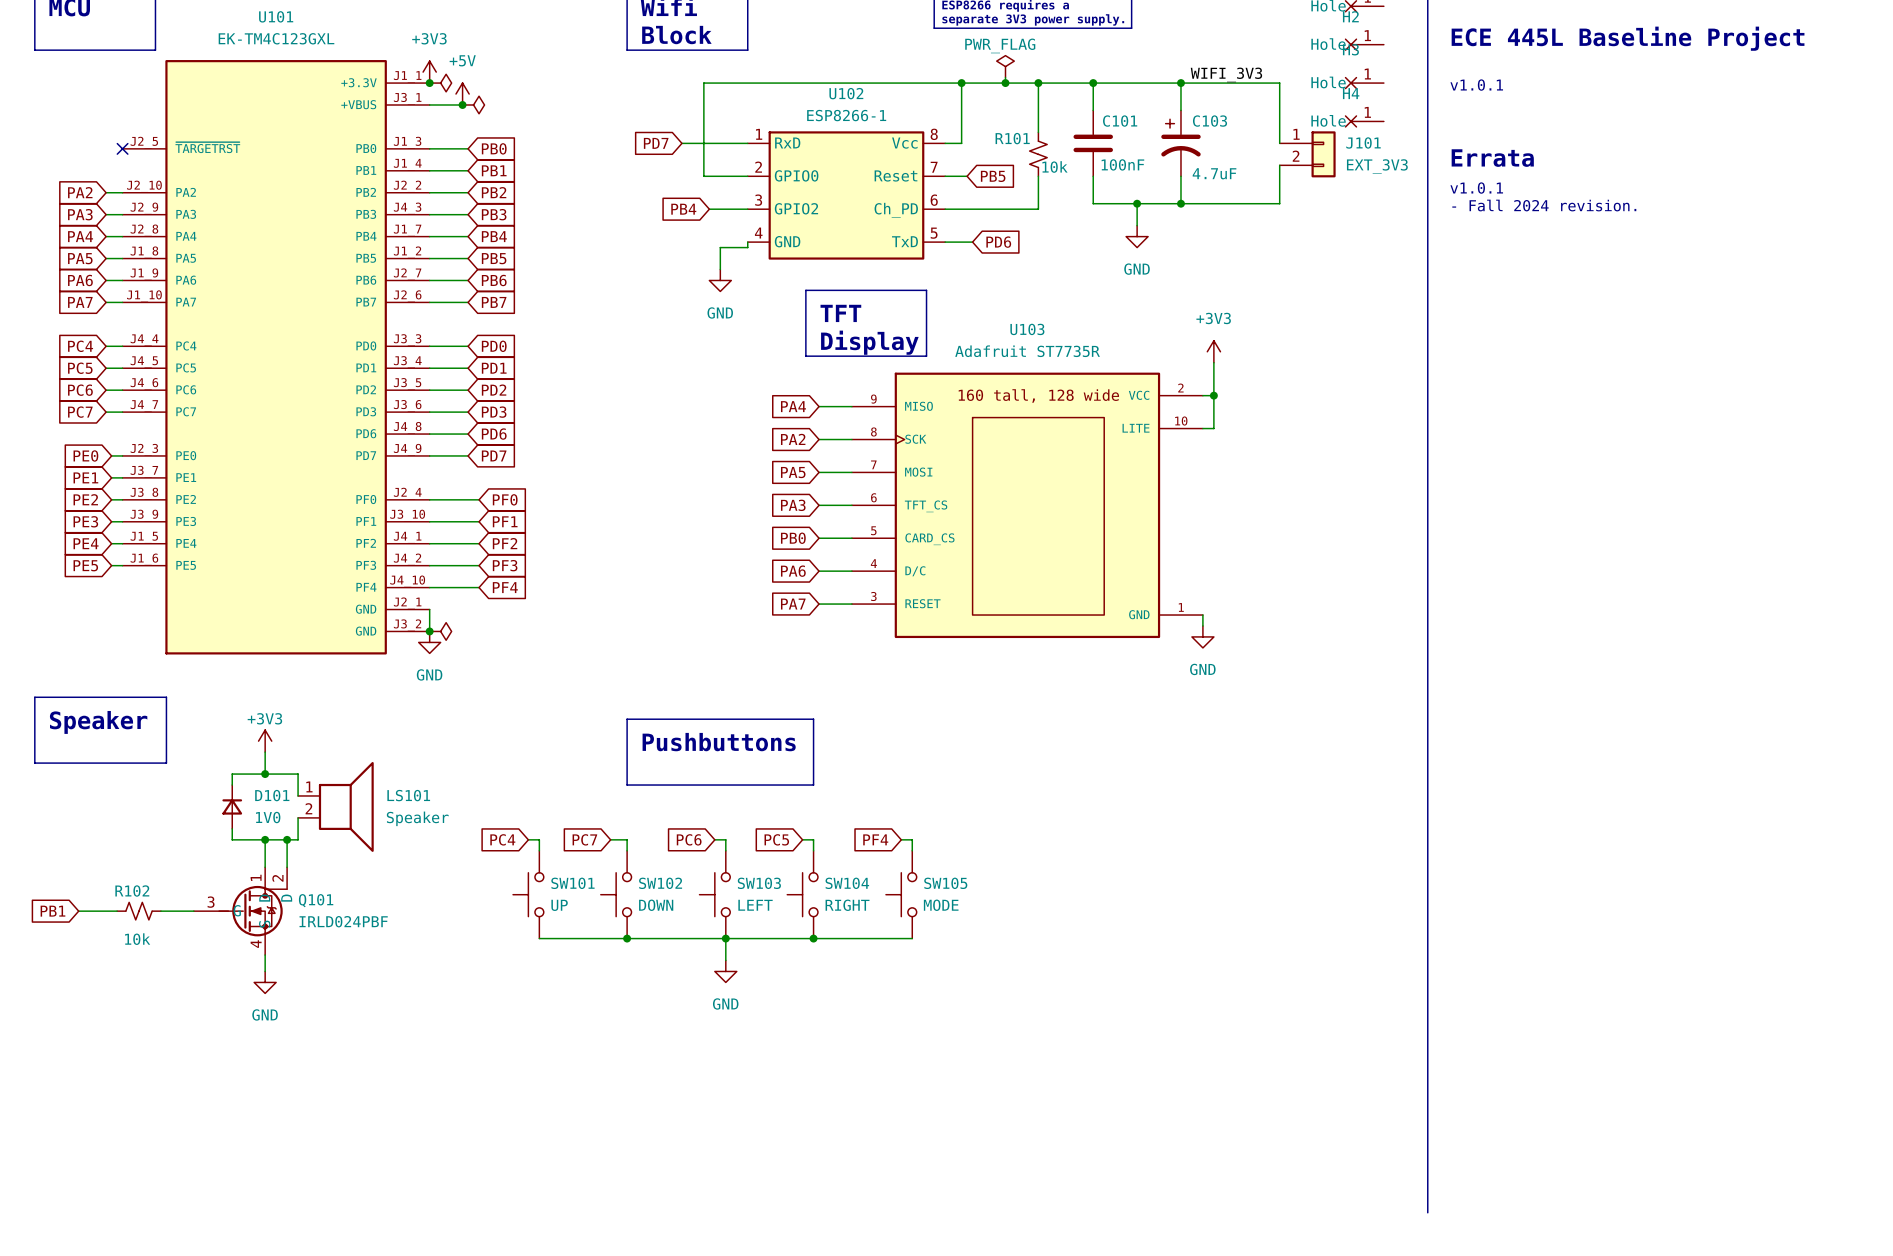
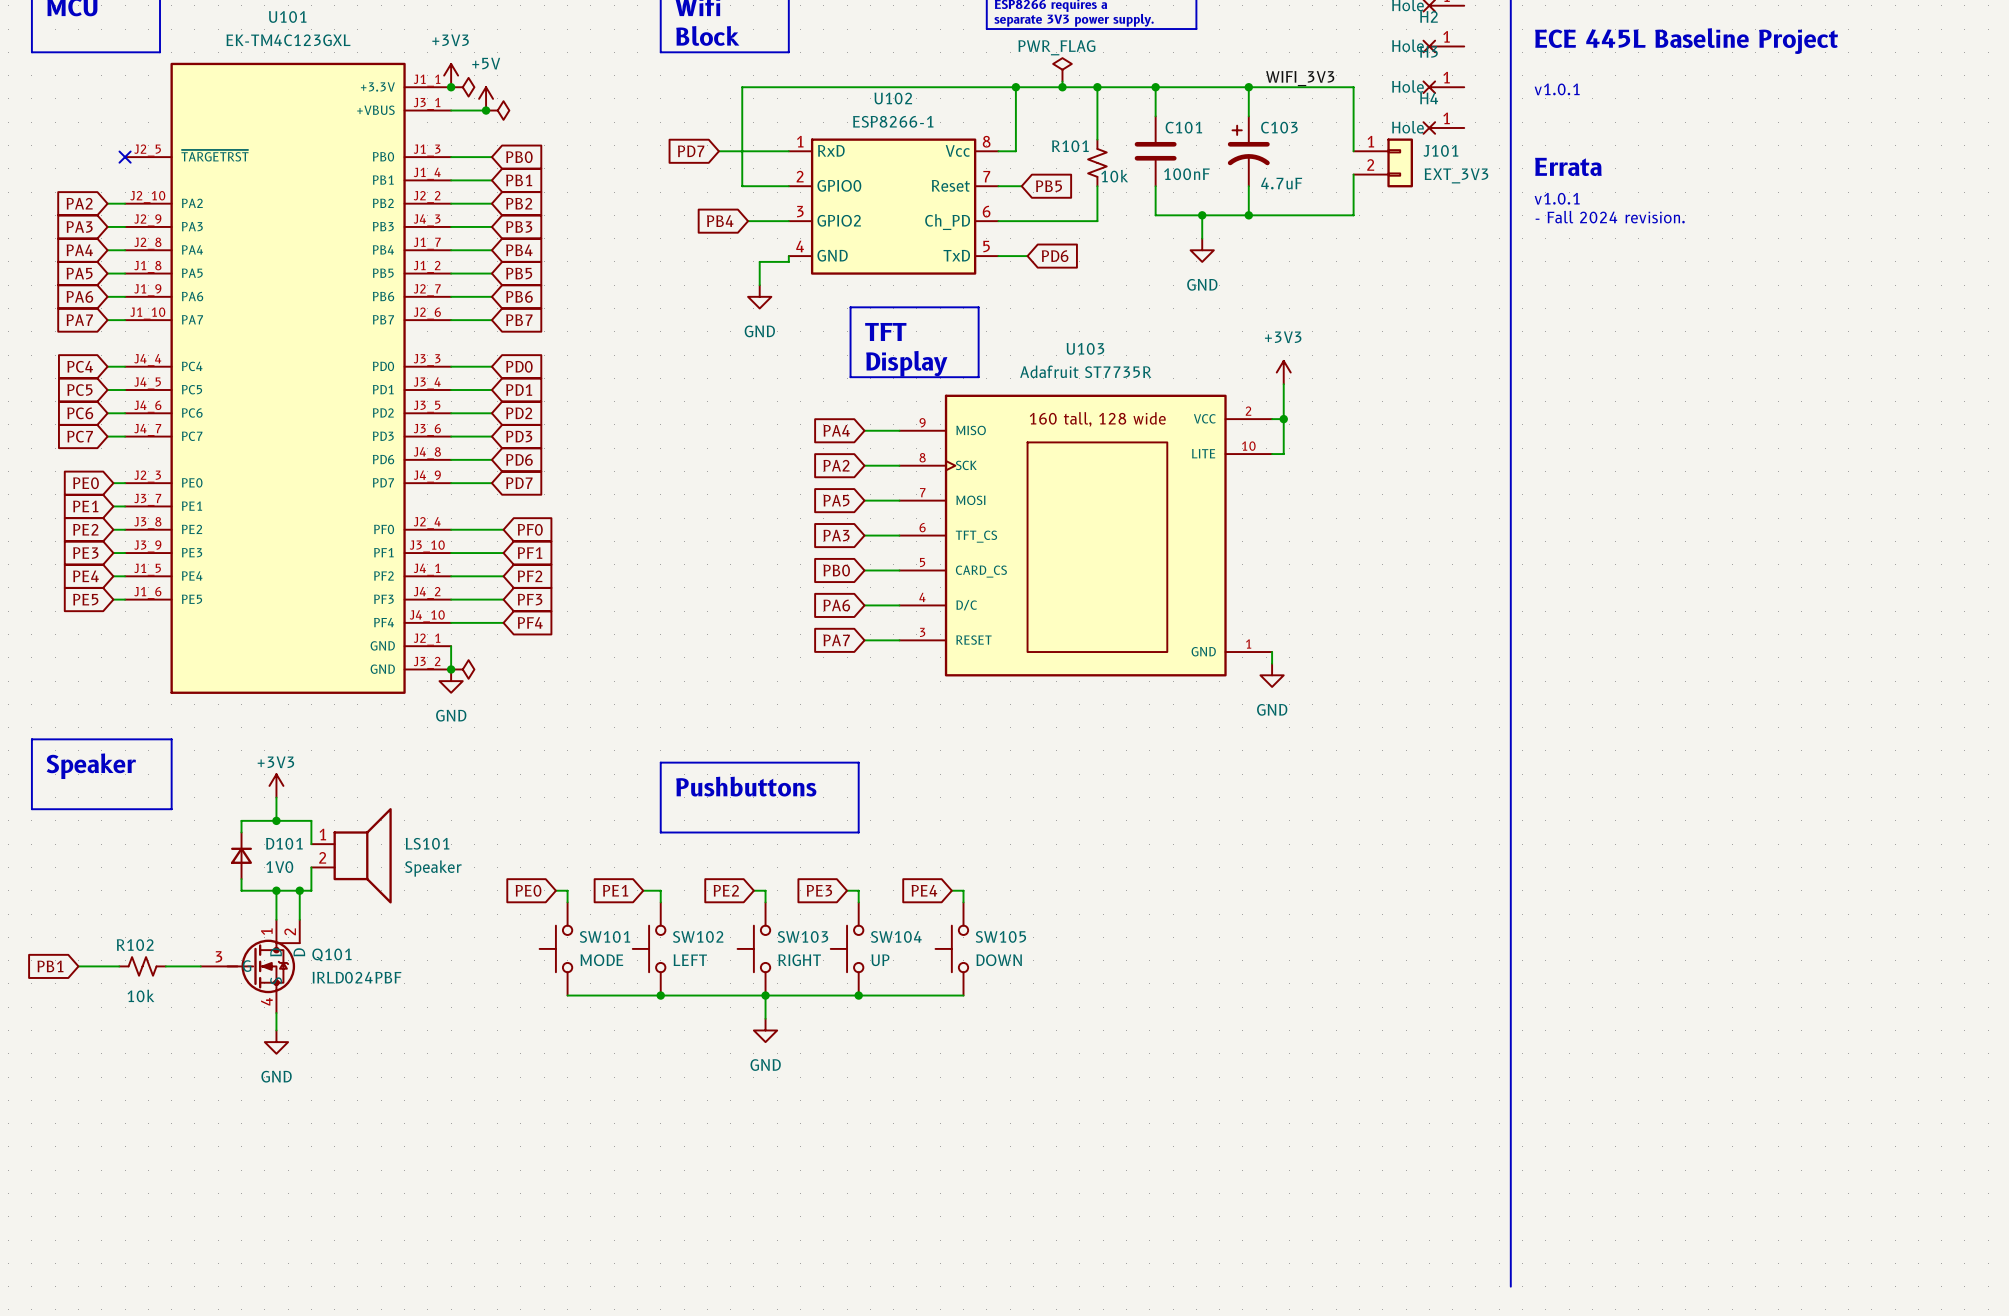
global label: PC4 (502, 839) -> PE0 (528, 890)
global label: PC7 (584, 839) -> PE1 (615, 890)
global label: PC6 (689, 839) -> PE2 (726, 890)
global label: PC5 (776, 839) -> PE3 (819, 890)
global label: PF4 (875, 839) -> PE4 (924, 890)
SW101 value: UP (559, 905) -> MODE (601, 960)
SW102 value: DOWN (656, 905) -> LEFT (690, 960)
SW103 value: LEFT (755, 905) -> RIGHT (799, 960)
SW104 value: RIGHT (847, 905) -> UP (880, 960)
SW105 value: MODE (941, 905) -> DOWN (999, 960)

